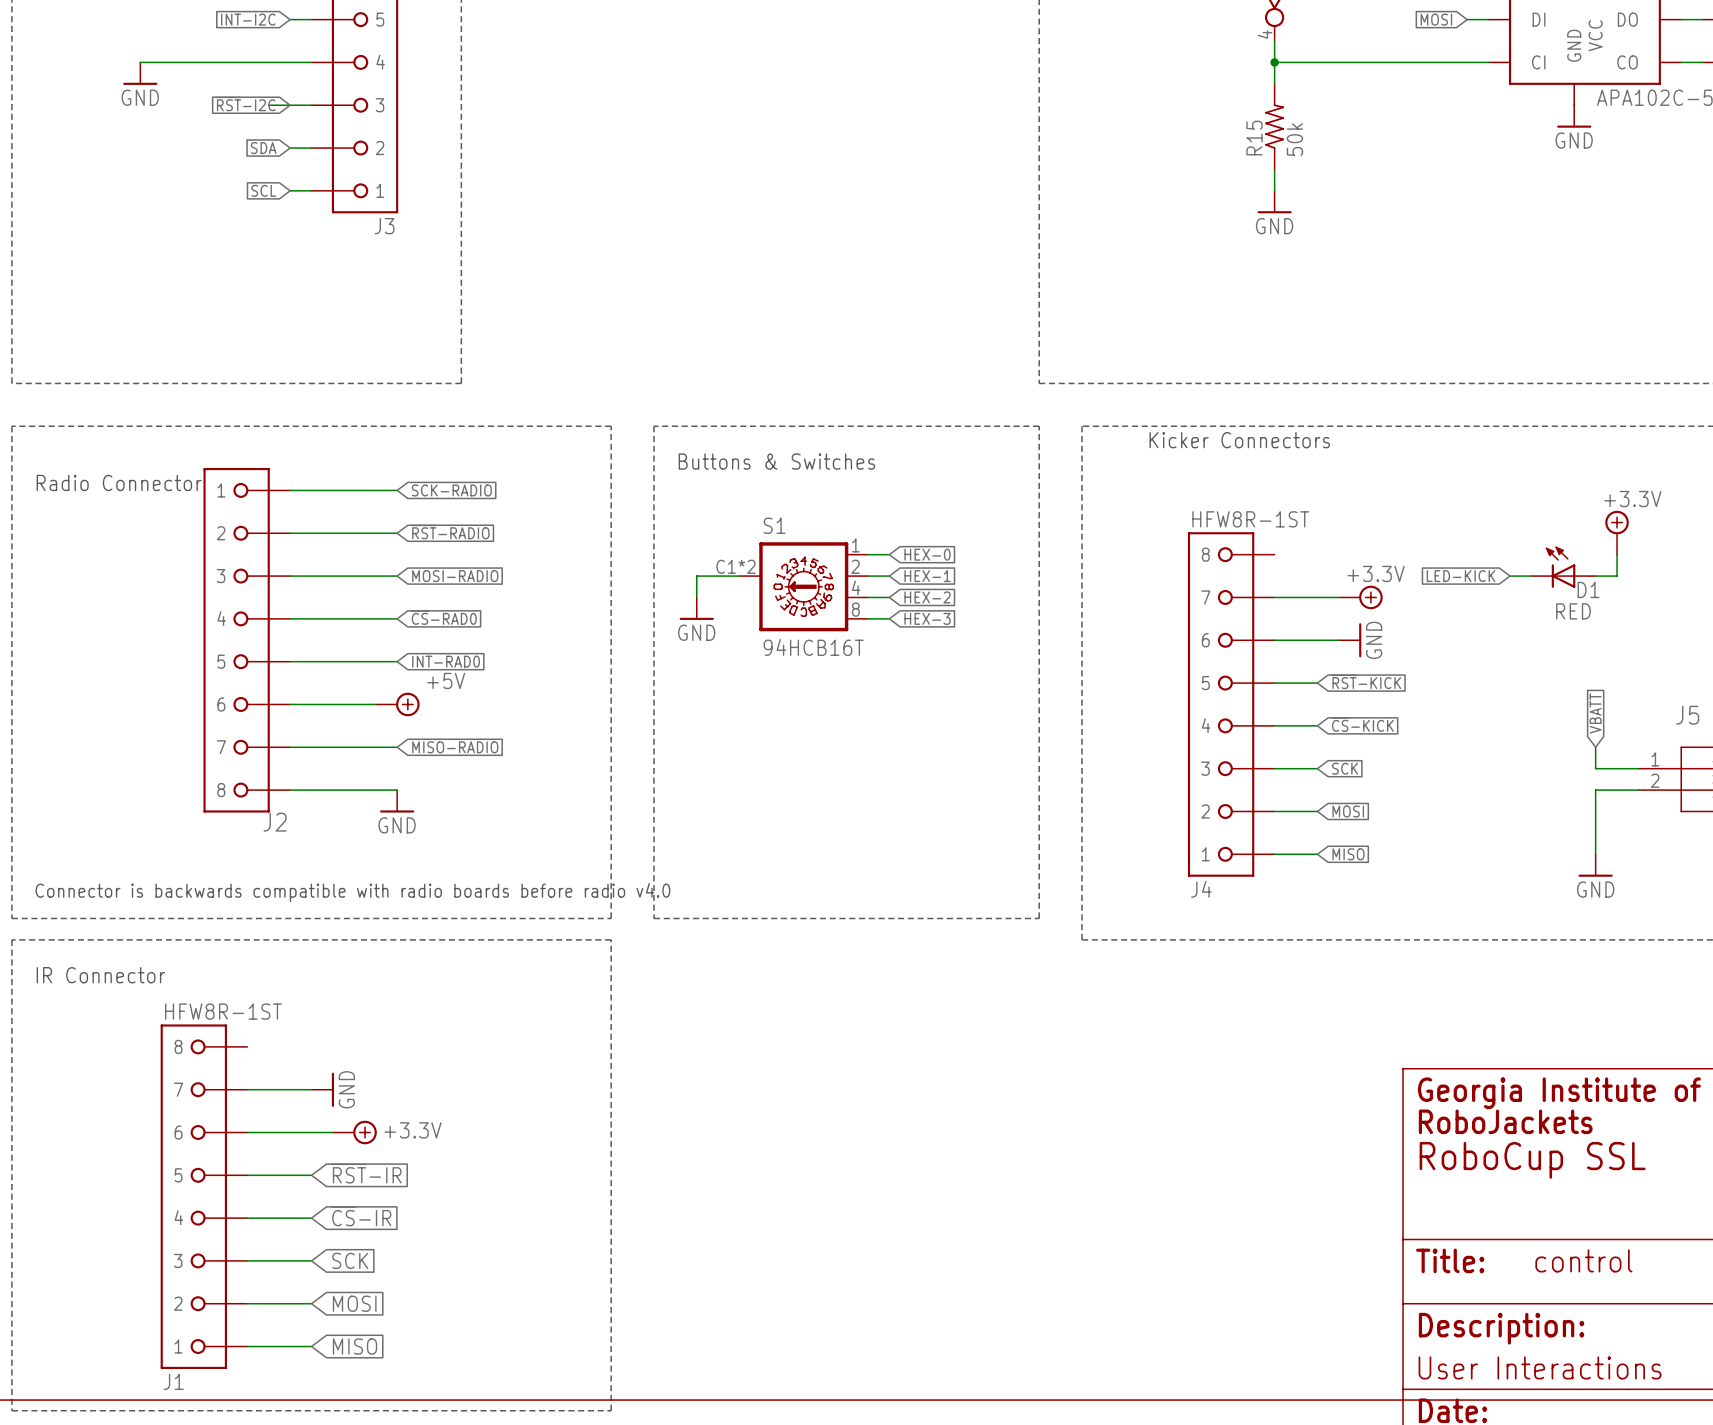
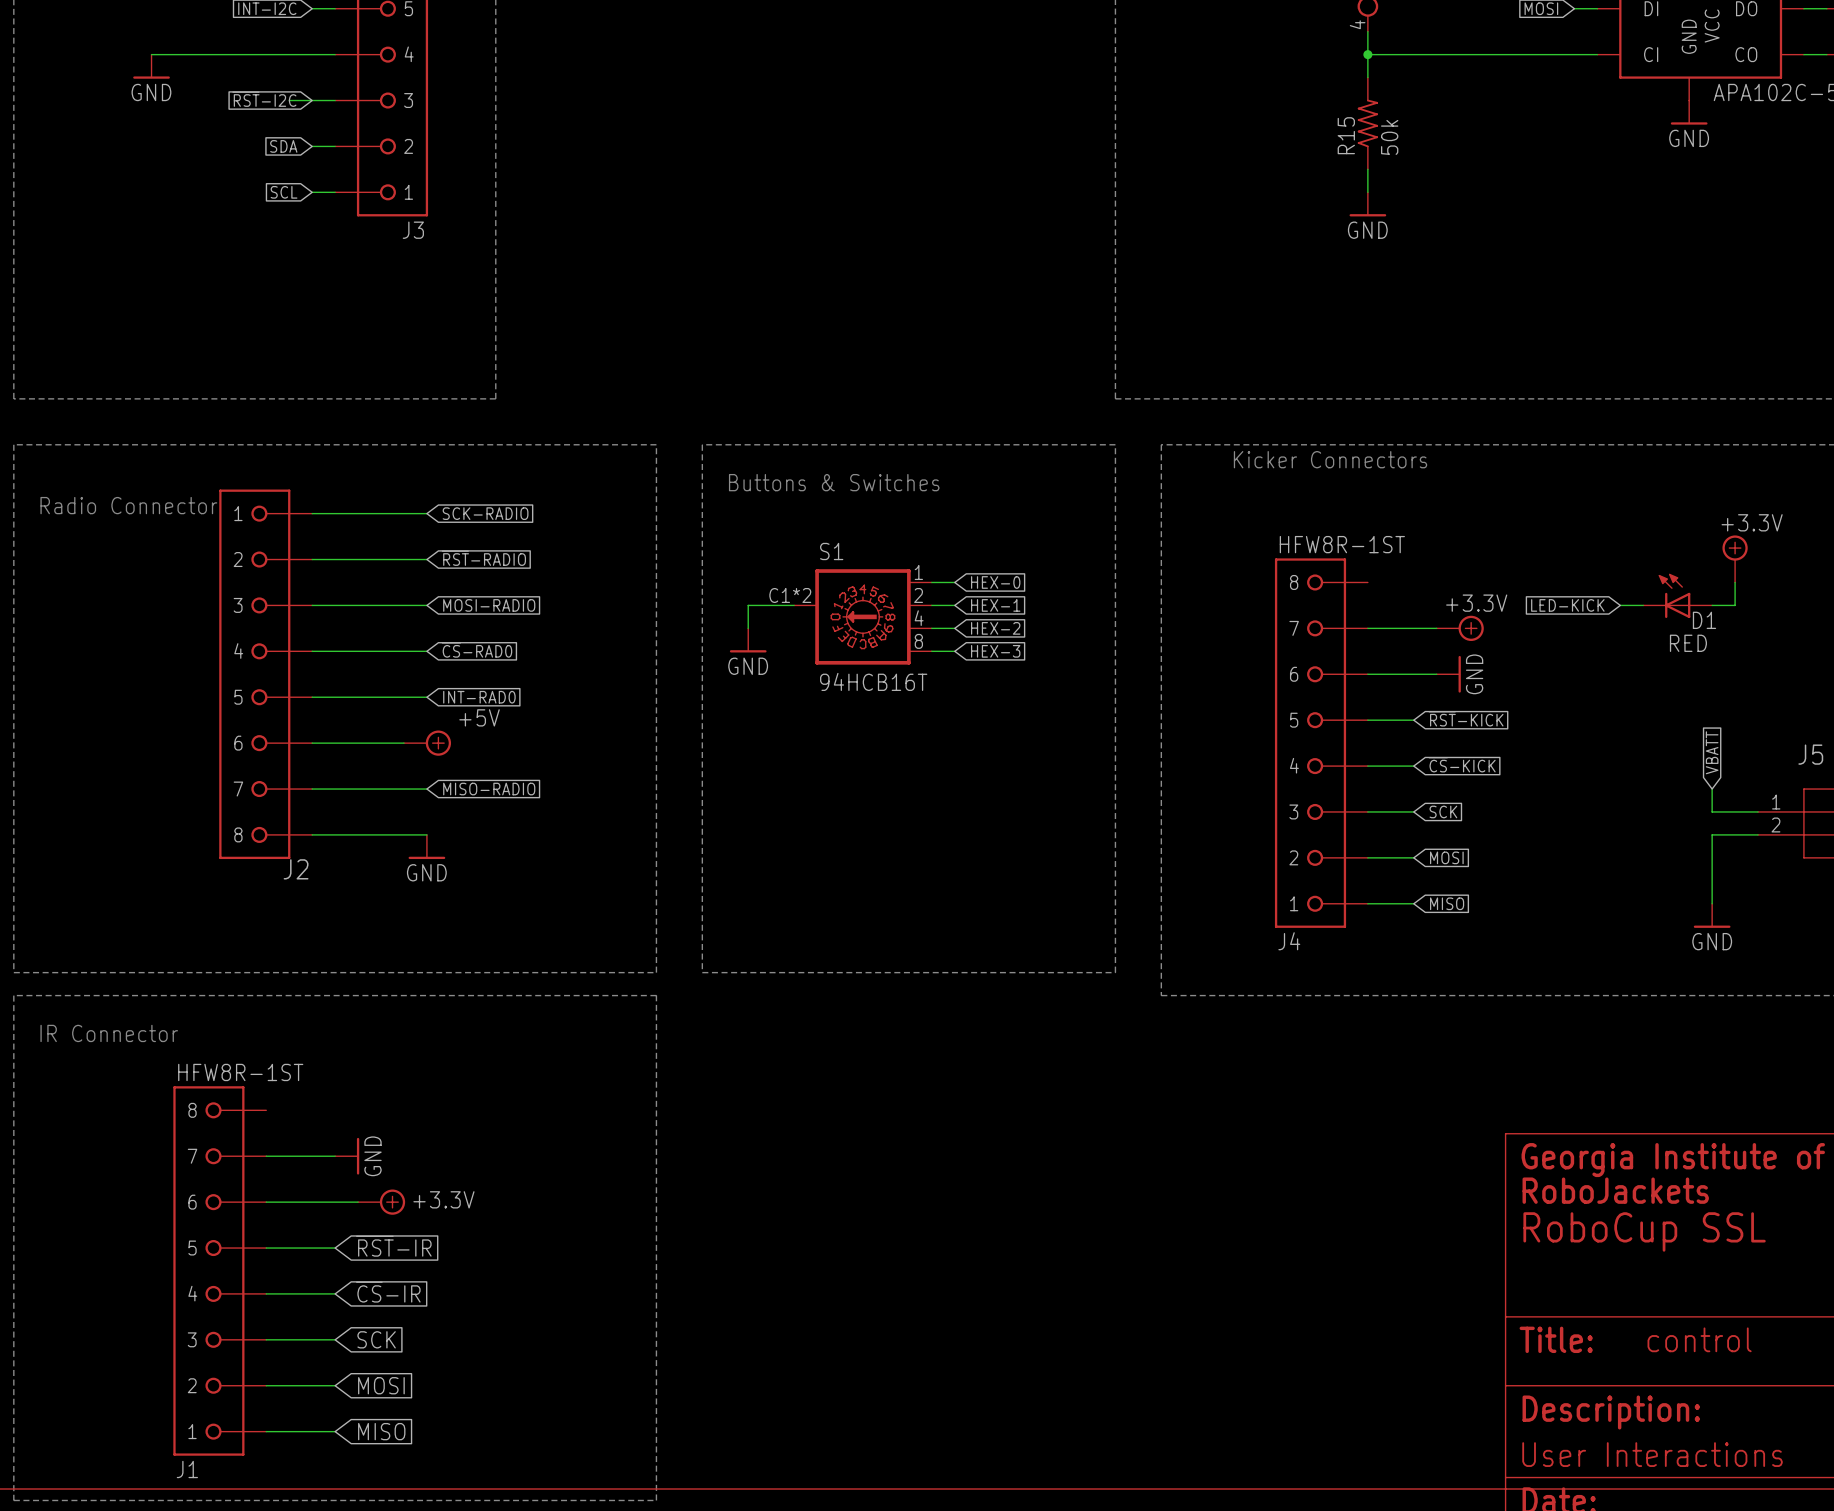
text: Connector is backwards compatible with radio boards before radio v4.0 (352, 892) -> none

